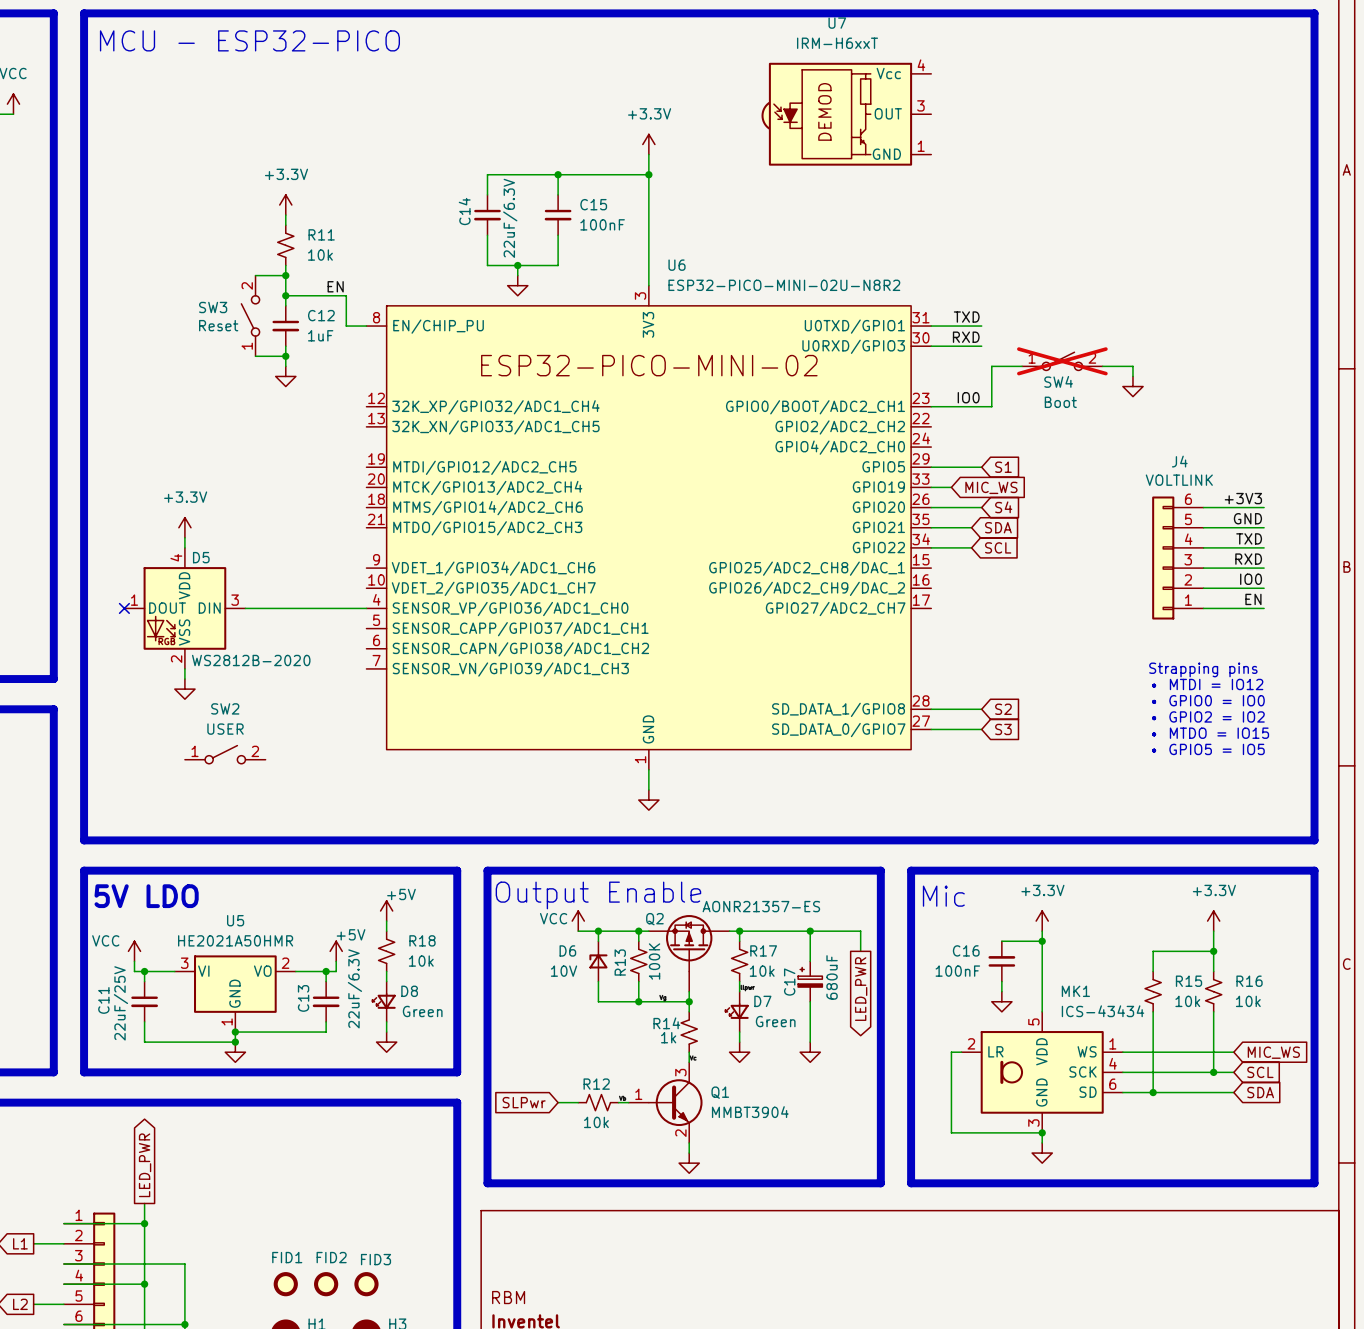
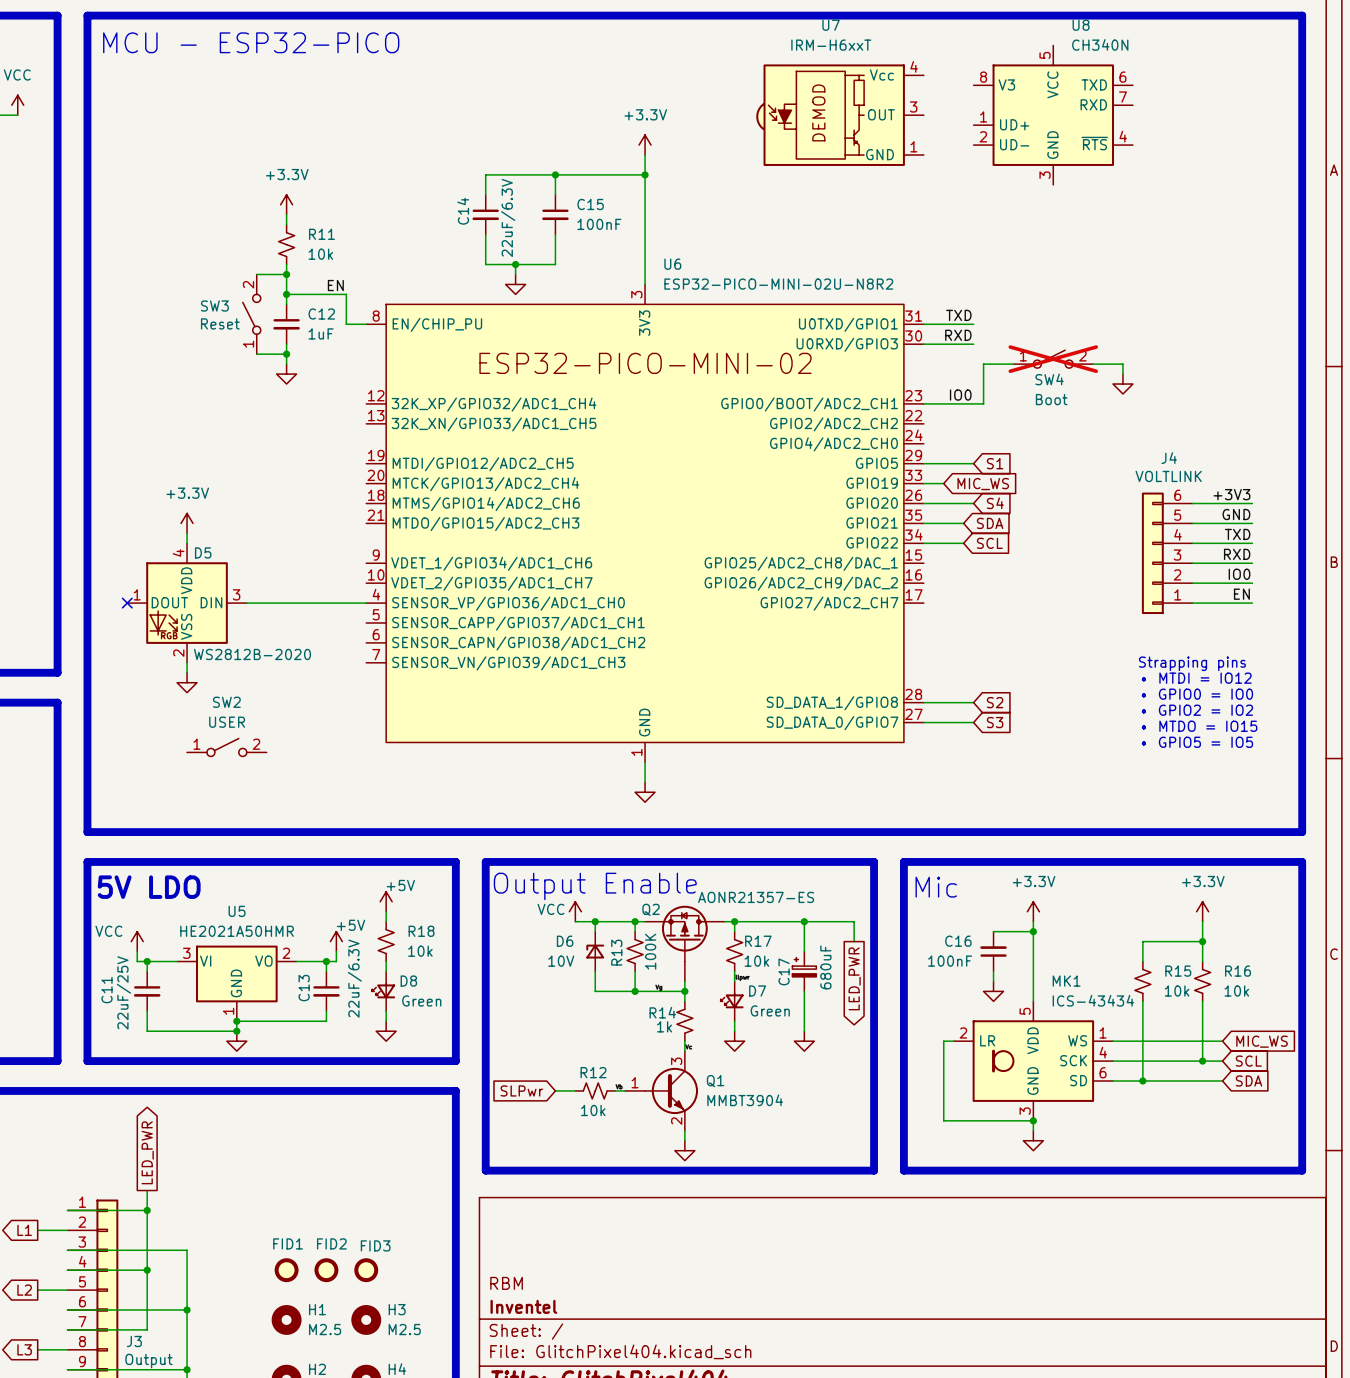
U8: none -> CH340N (1053, 115)

